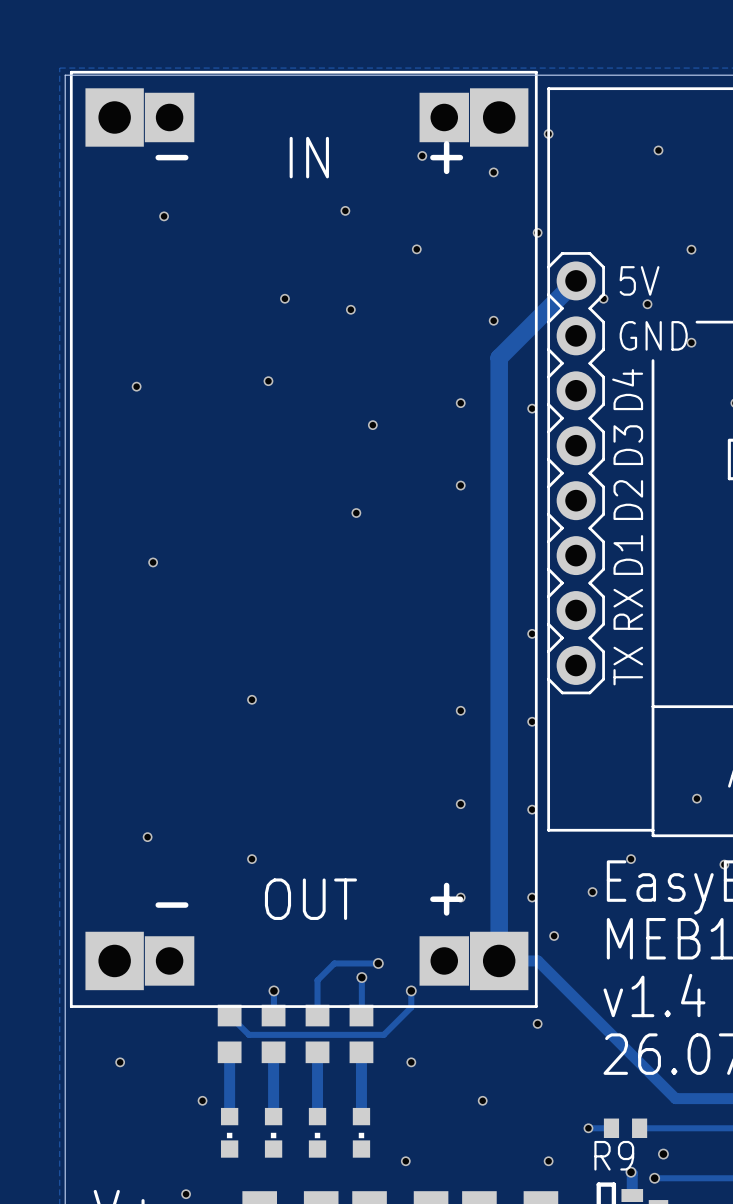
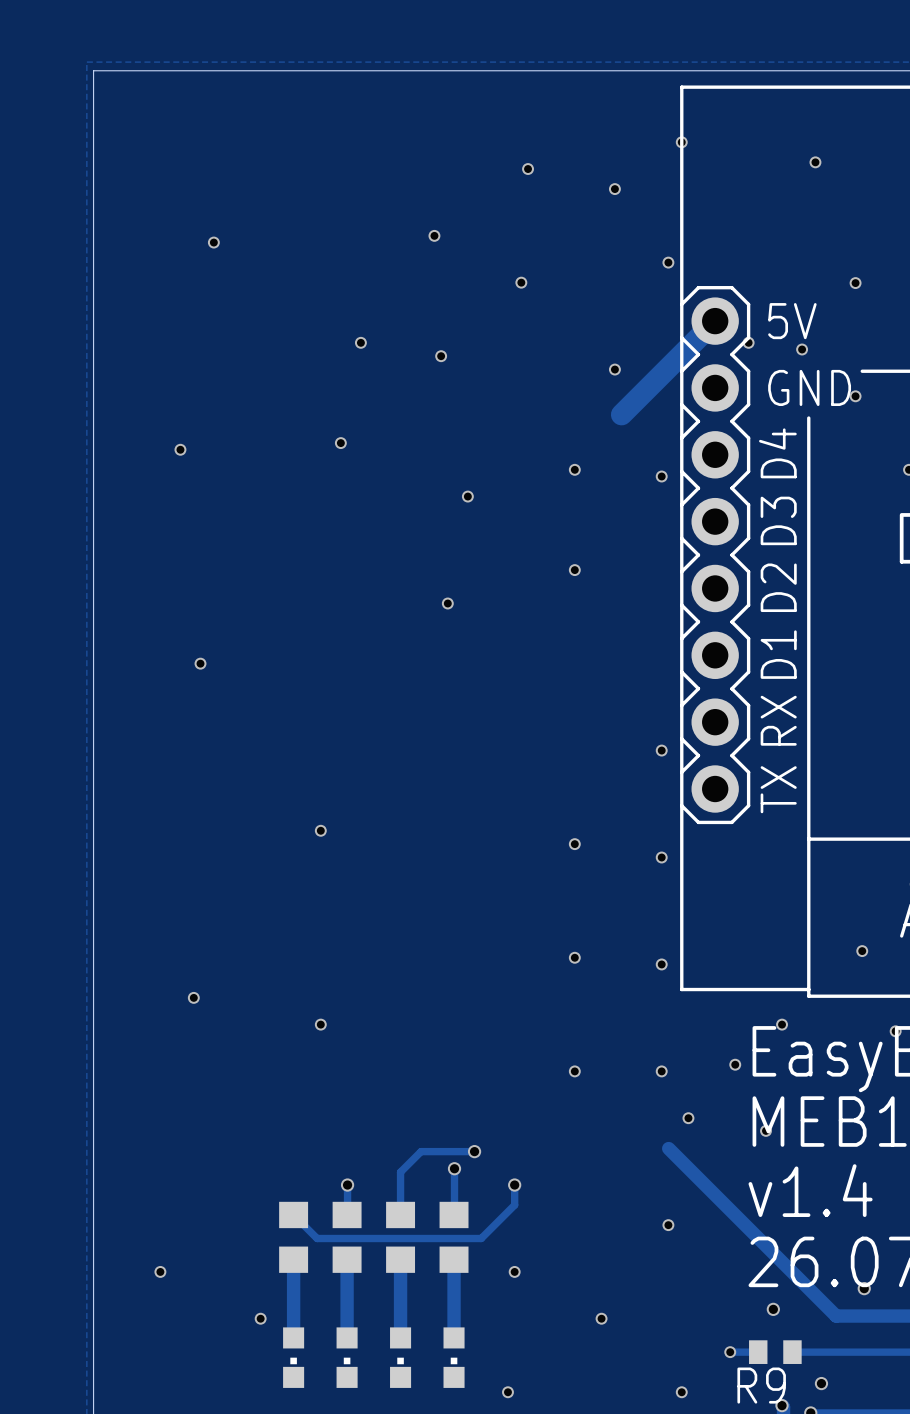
track: (499, 357) (499, 960) (537, 960) -> none
part: (303, 539) -> none
via: none -> (765, 1130)
via: none -> (864, 1288)
via: none -> (773, 1309)

